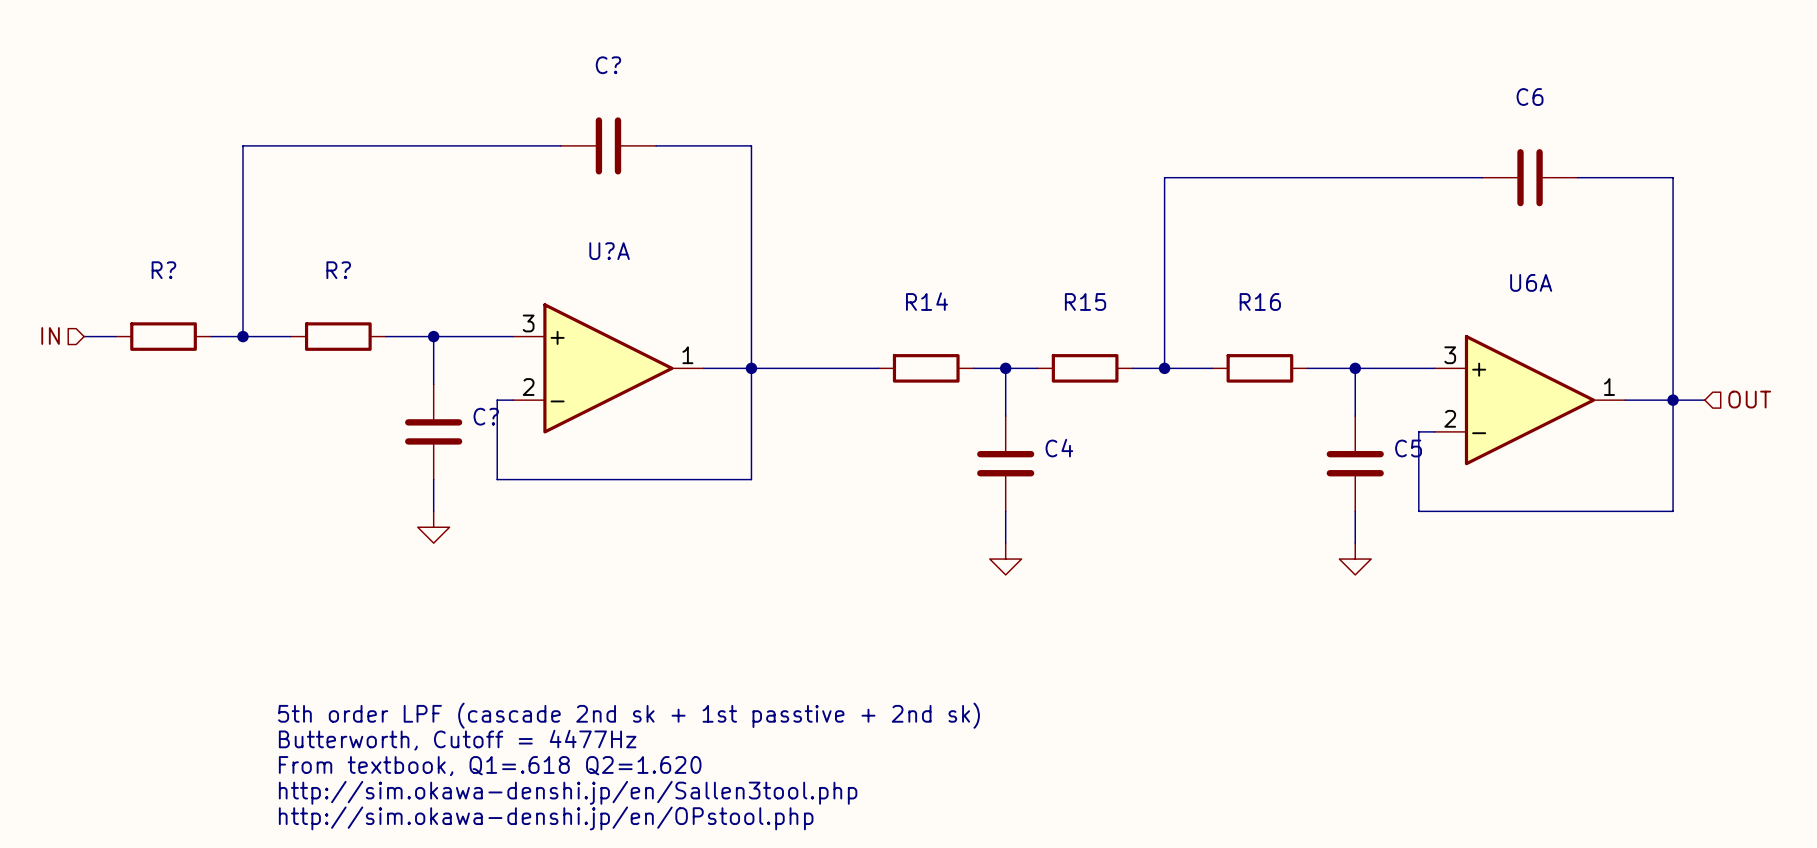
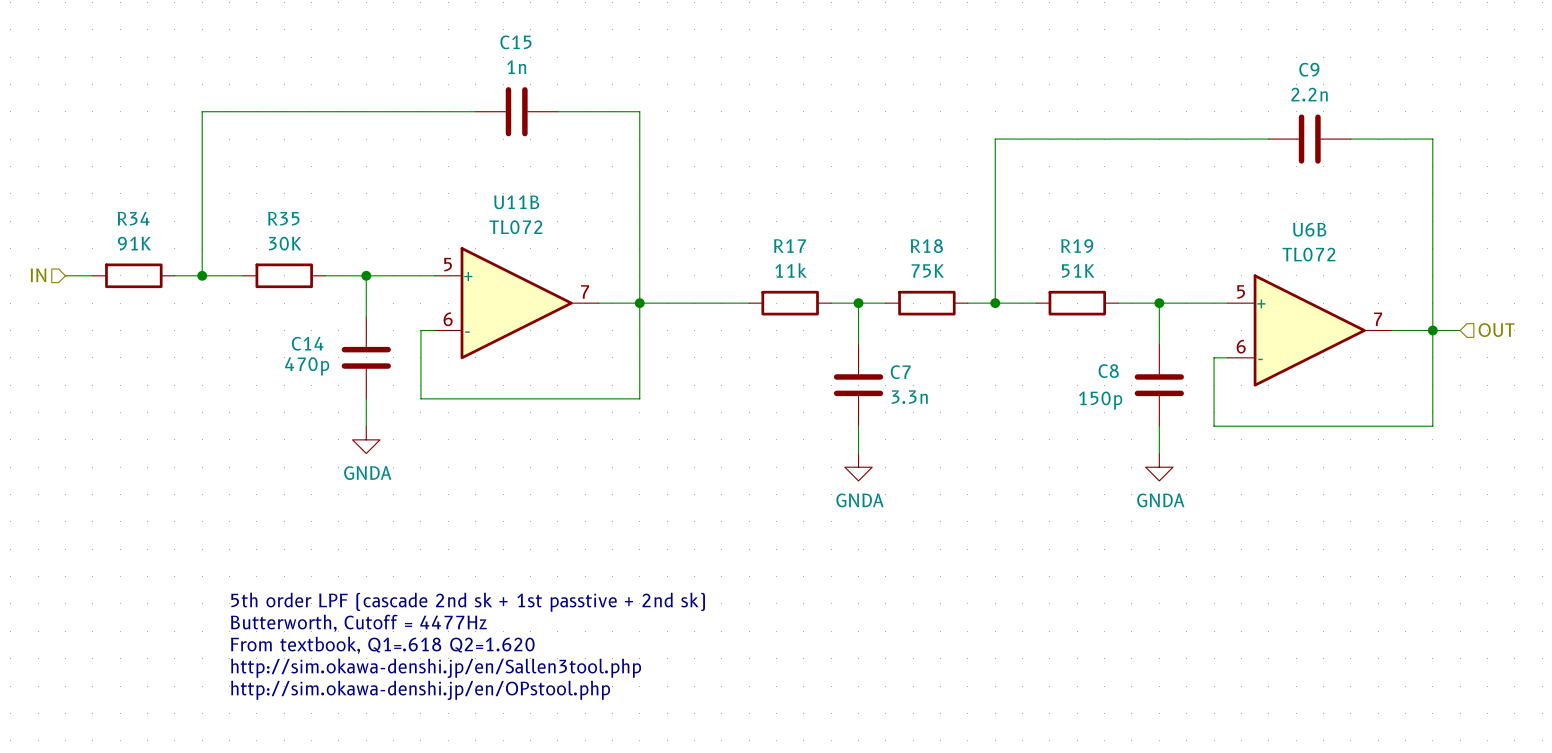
C? name: C? (608, 65) -> C15 (515, 42)
C? value: none -> 1n (516, 67)
C6 name: C6 (1530, 97) -> C9 (1309, 69)
C6 value: none -> 2.2n (1309, 94)
U?A name: U?A (609, 251) -> U11B (516, 202)
R? name: R? (163, 270) -> R34 (133, 218)
R? name: R? (338, 270) -> R35 (283, 218)
U?A value: none -> TL072 (515, 227)
U6A name: U6A (1531, 282) -> U6B (1309, 229)
R? value: none -> 91K (134, 243)
R? value: none -> 30K (285, 243)
R14 name: R14 (927, 301) -> R17 (789, 246)
R15 name: R15 (1085, 301) -> R18 (926, 246)
R16 name: R16 (1260, 301) -> R19 (1077, 246)
U6A value: none -> TL072 (1309, 254)
U?A pin number: 3 (528, 323) -> 5 (448, 264)
R14 value: none -> 11k (791, 270)
R15 value: none -> 75K (927, 270)
R16 value: none -> 51K (1078, 270)
U?A pin number: 1 (687, 355) -> 7 (585, 291)
U6A pin number: 3 (1450, 355) -> 5 (1241, 291)
U?A pin number: 2 (528, 387) -> 6 (448, 319)
U6A pin number: 1 (1609, 387) -> 7 (1378, 319)
C? name: C? (486, 416) -> C14 (307, 343)
U6A pin number: 2 (1450, 418) -> 6 (1241, 346)
C? value: none -> 470p (307, 366)
C4 name: C4 (1059, 448) -> C7 (900, 372)
C5 name: C5 (1408, 448) -> C8 (1108, 371)
C4 value: none -> 3.3n (909, 397)
C5 value: none -> 150p (1100, 400)
power symbol text: none -> GNDA (367, 473)
power symbol text: none -> GNDA (859, 500)
power symbol text: none -> GNDA (1160, 500)

